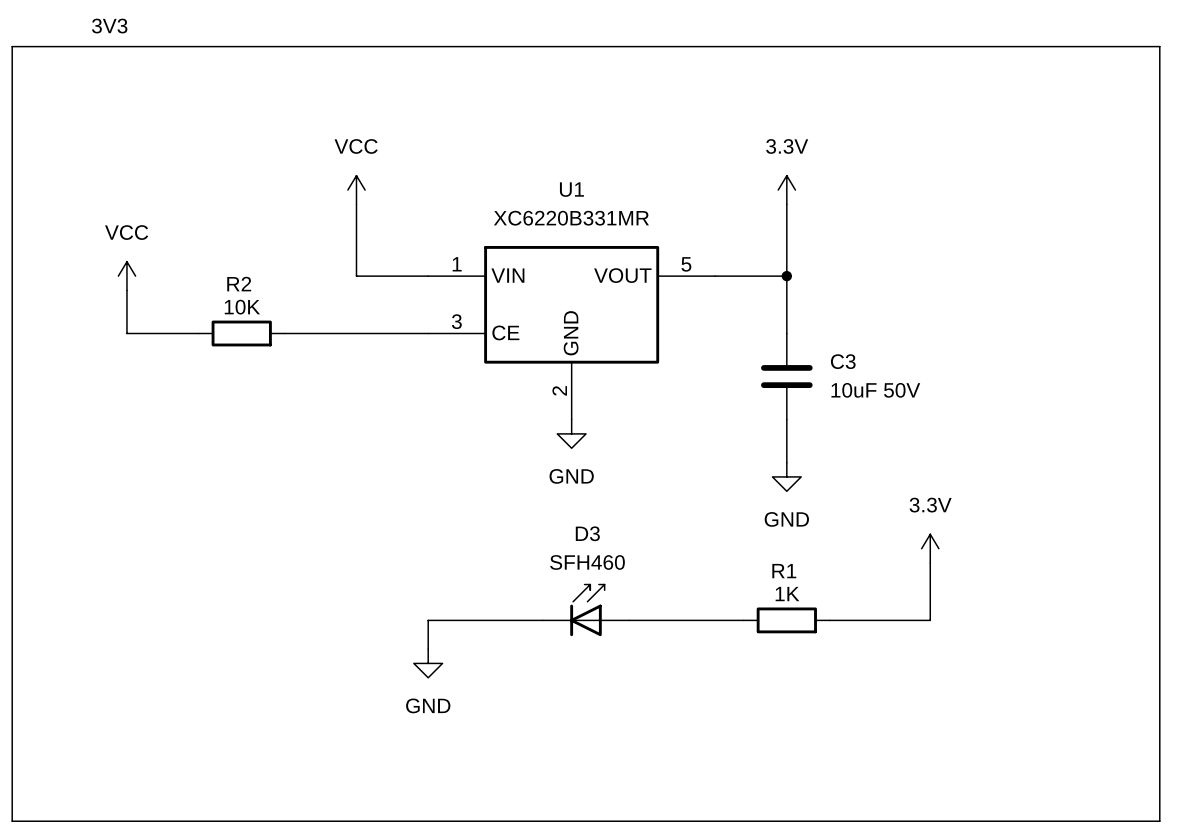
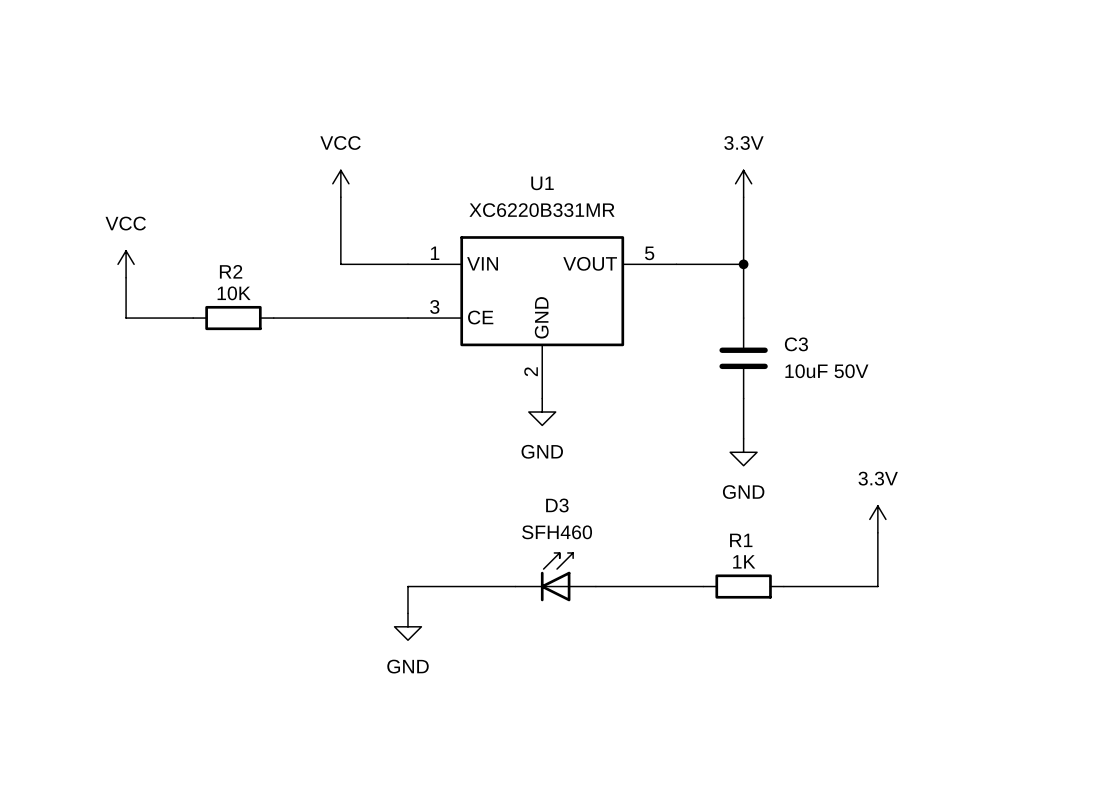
text: 3V3 (109, 26) -> none
line: (12, 46) (1159, 46) (1159, 821) (12, 821) (12, 46) -> none

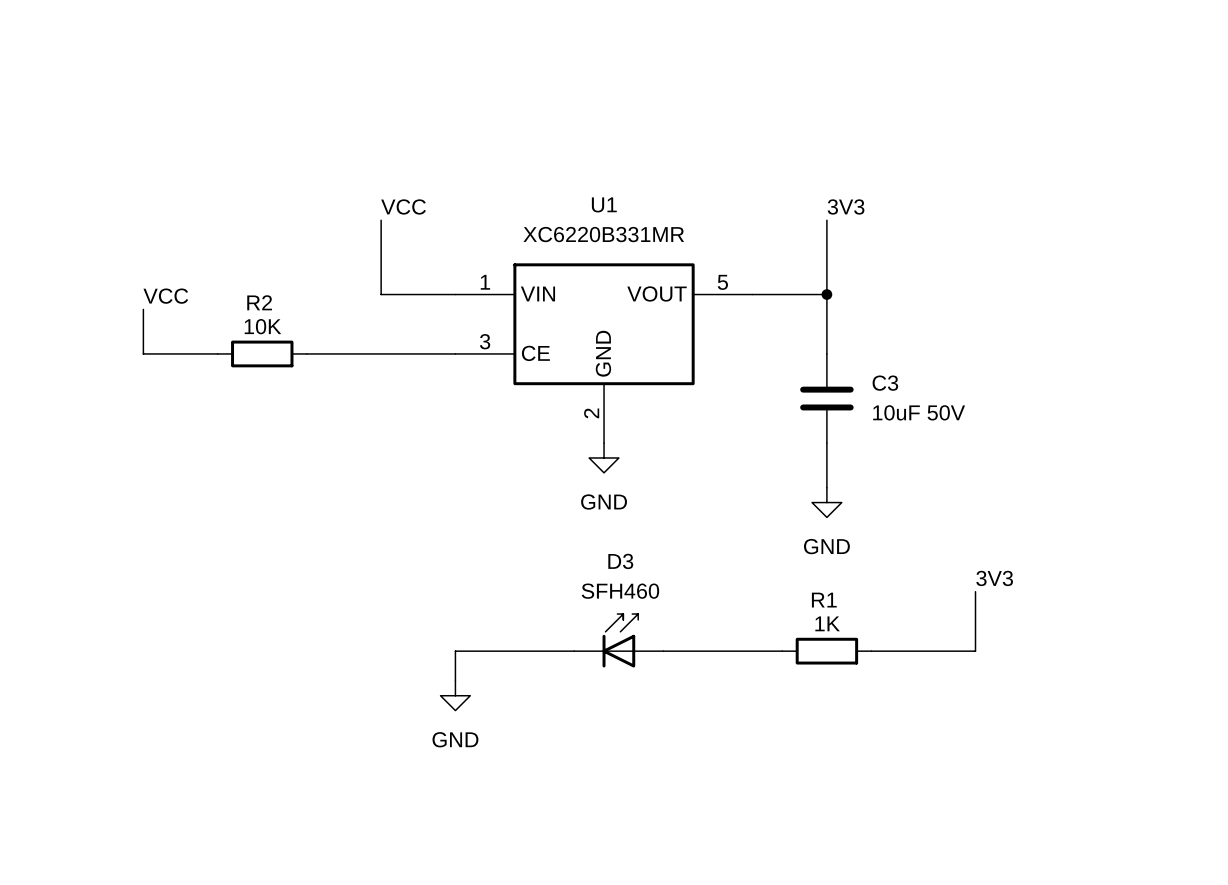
power symbol: VCC (340, 183) -> none
power symbol: 3.3V (743, 183) -> none
label: none -> VCC (403, 206)
label: none -> 3V3 (846, 206)
power symbol: VCC (126, 264) -> none
label: none -> VCC (165, 296)
power symbol: 3.3V (877, 519) -> none
label: none -> 3V3 (994, 578)

